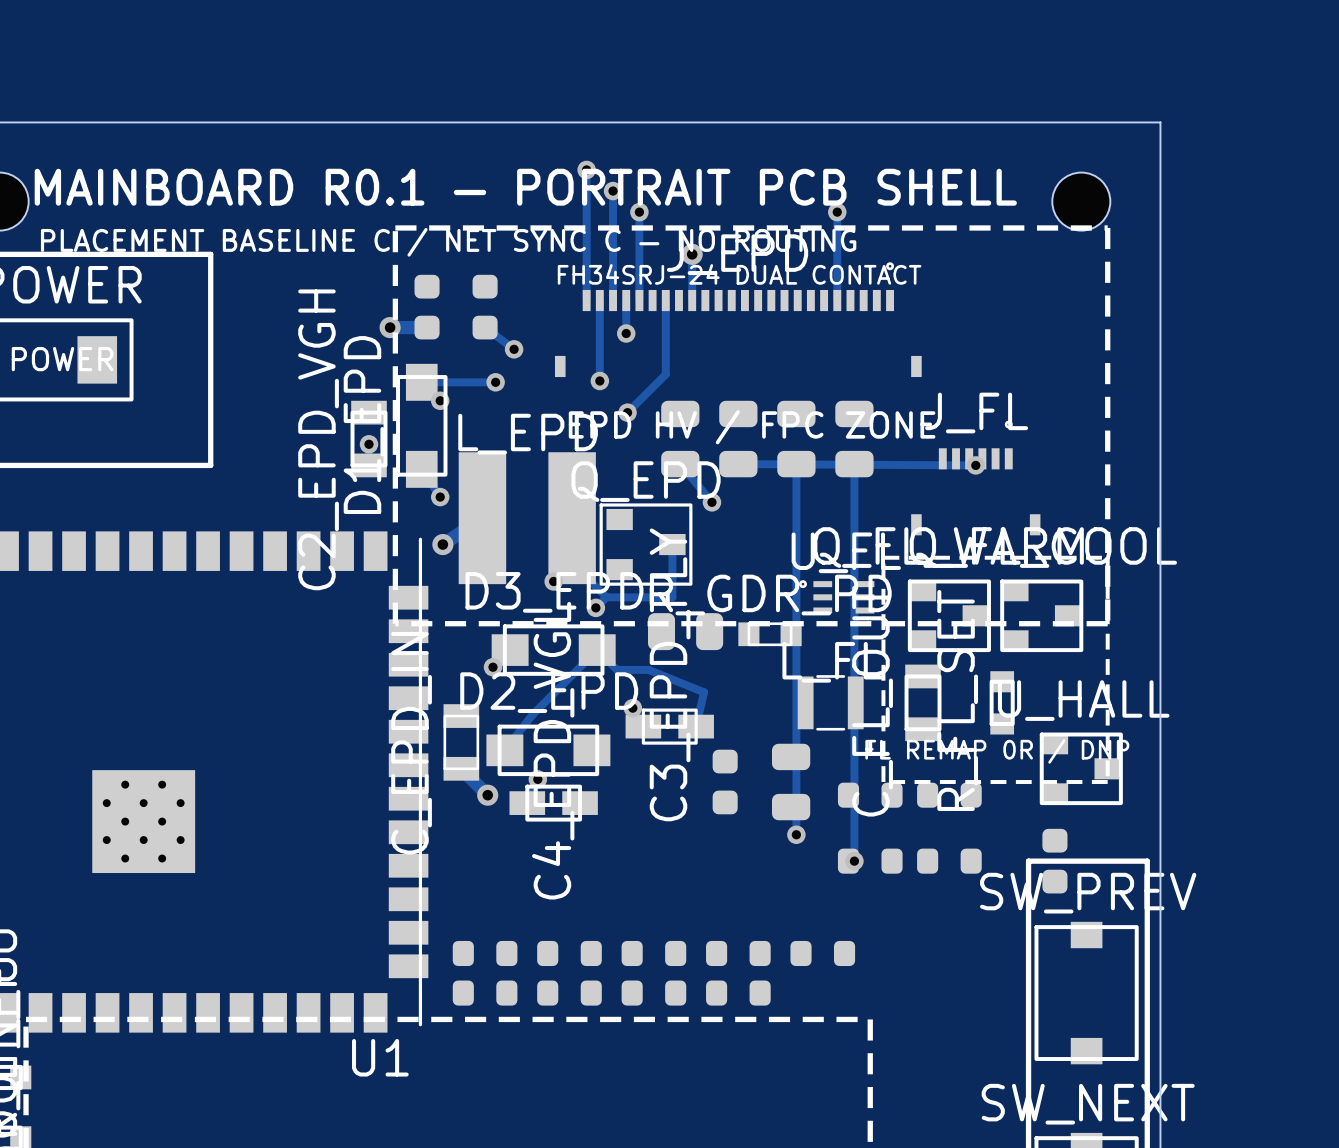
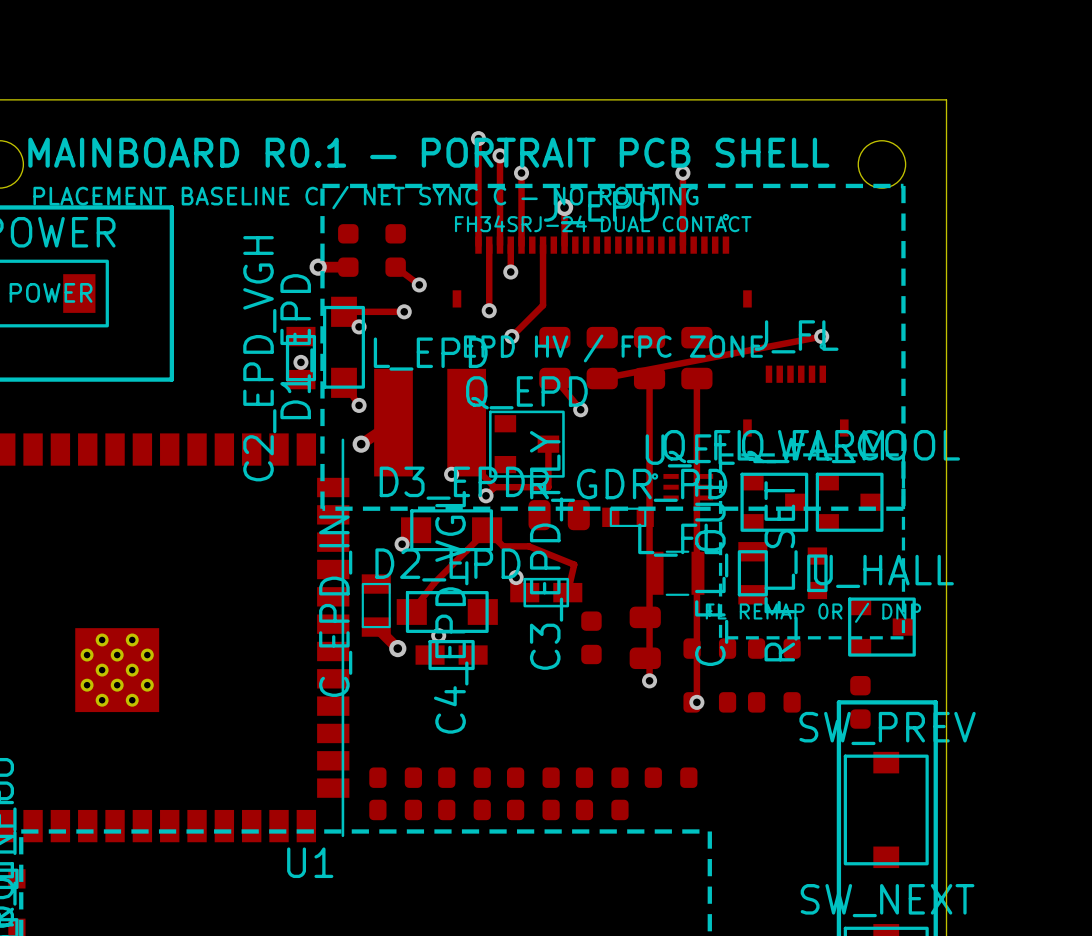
track: (738, 464) (975, 465) -> (602, 378) (821, 336)
via position: (975, 465) -> (821, 336)

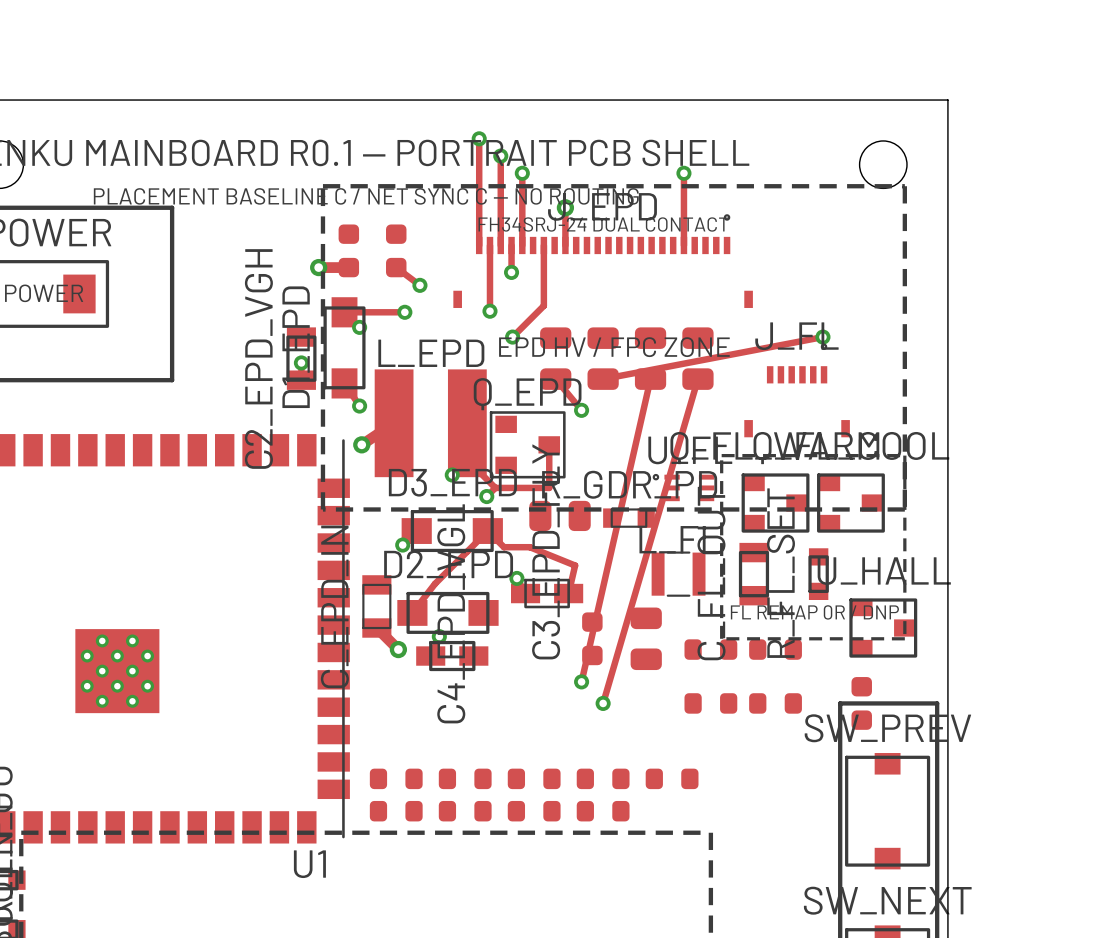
track: (649, 378) (649, 680) -> (650, 379) (581, 681)
track: (696, 378) (696, 702) -> (697, 379) (603, 703)
via: none -> (581, 681)
via: (649, 680) -> none
via: none -> (603, 703)
via: (696, 702) -> none

